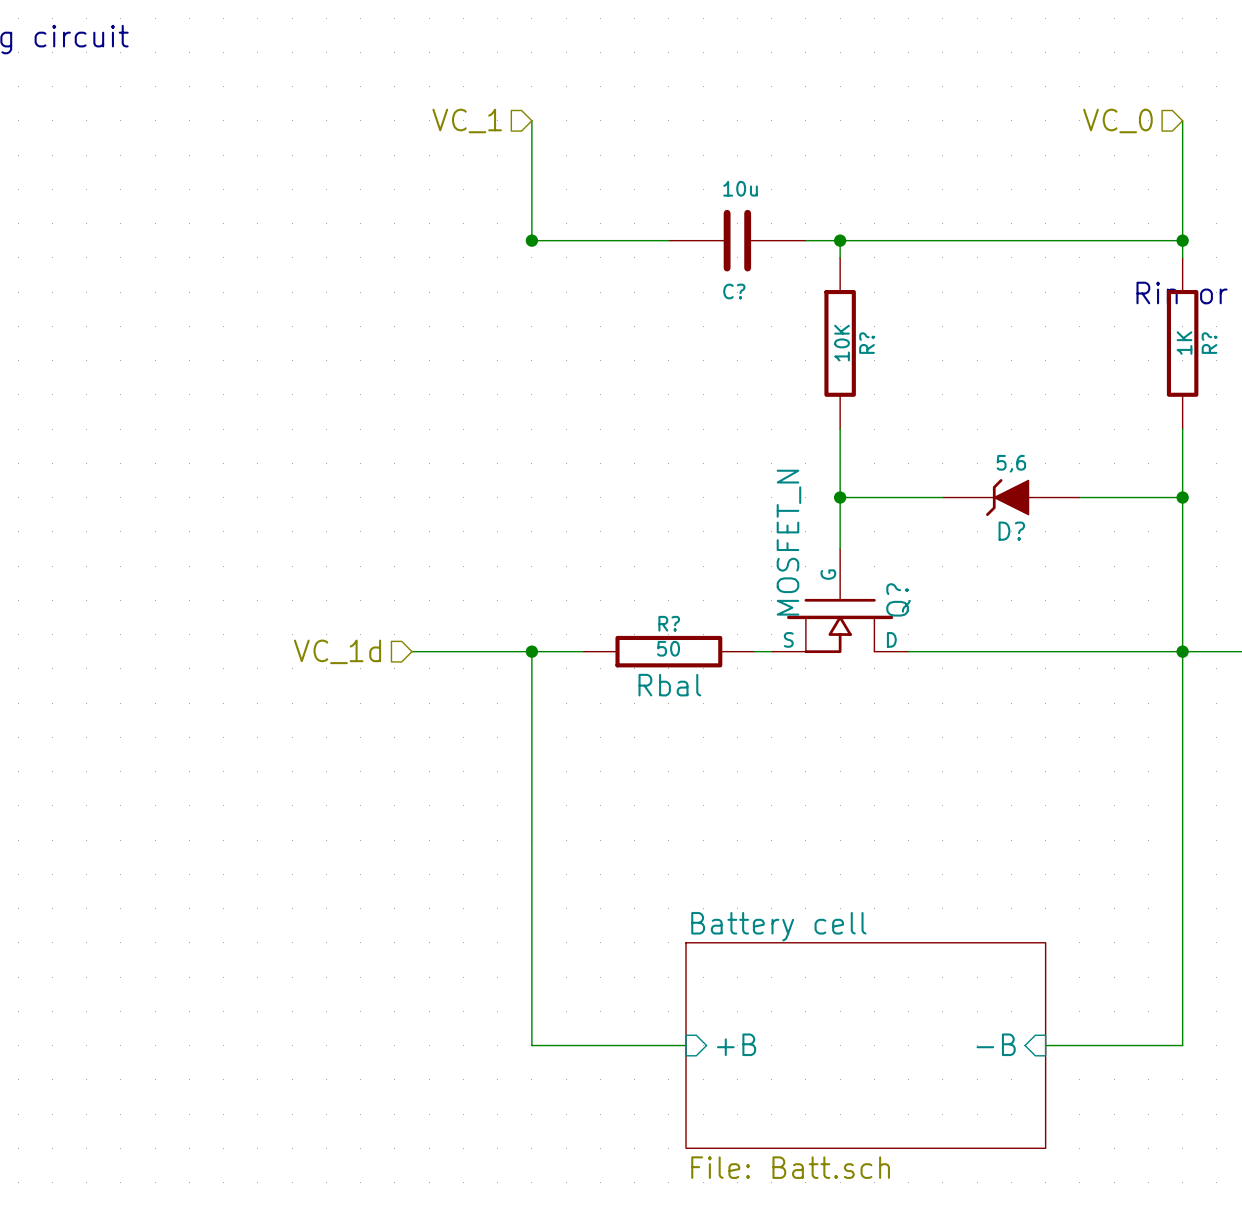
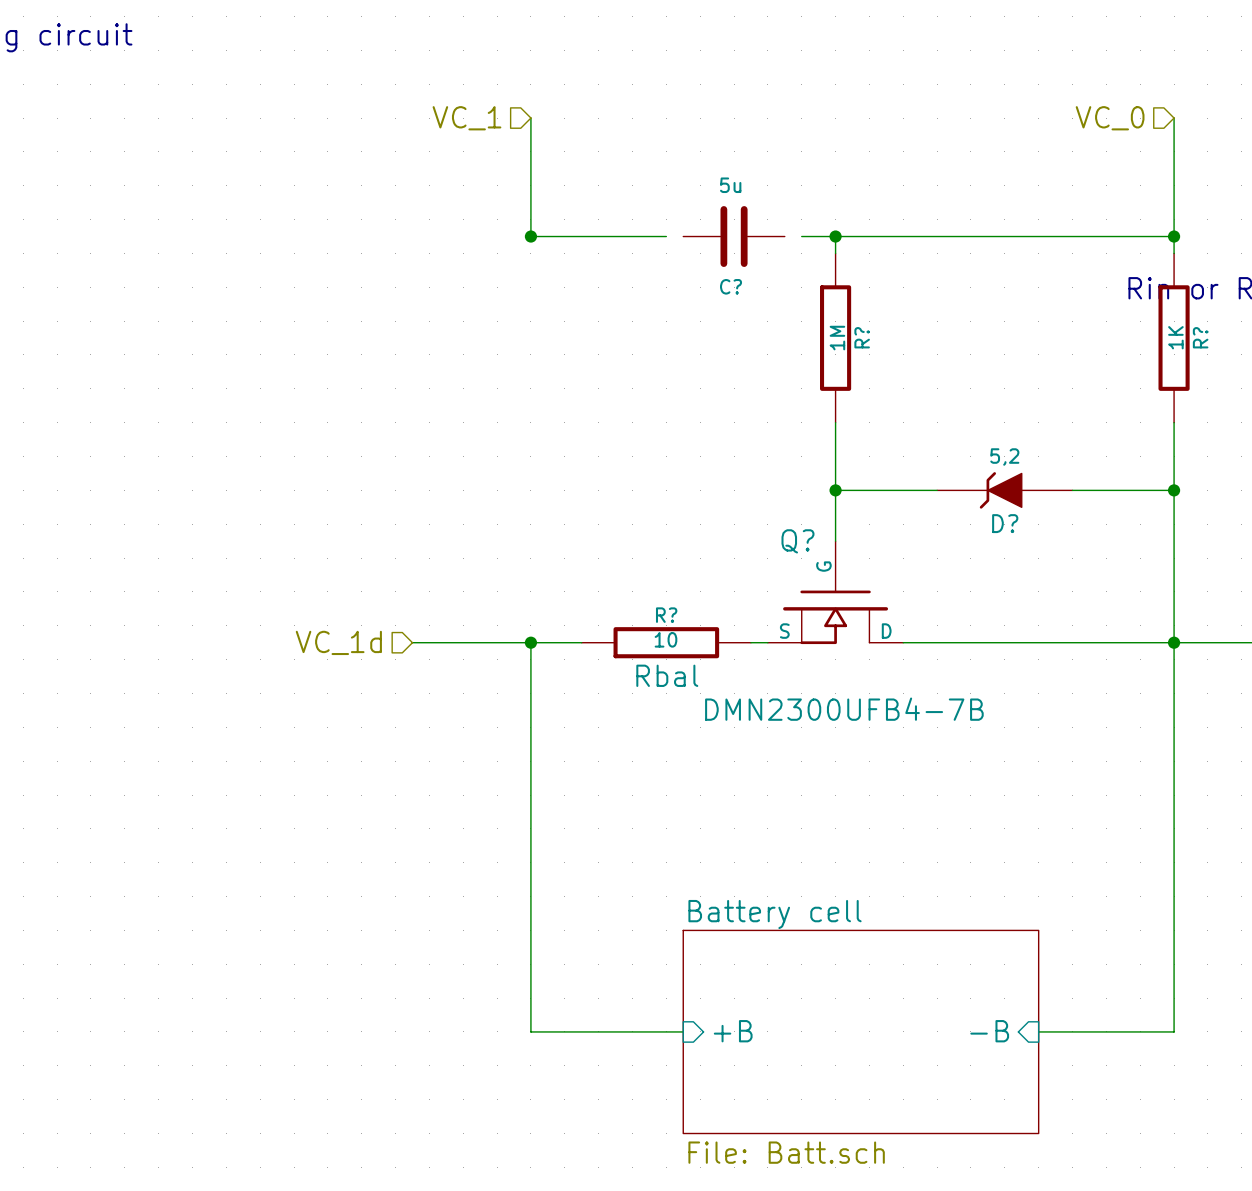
C? value: 10u (740, 188) -> 5u (730, 185)
C? symbol: [668, 209, 806, 272] -> [683, 206, 785, 267]
R? value: 10K (842, 343) -> 1M (837, 338)
D? value: 5,6 (1011, 463) -> 5,2 (1004, 457)
Q? value: MOSFET_N (788, 542) -> DMN2300UFB4-7B (844, 709)
Q? name rotation: 0° (898, 599) -> 90° clockwise (797, 541)
Q? name position: Q? (898, 599) -> Q? (797, 541)
R? value: 50 (668, 648) -> 10 (665, 639)

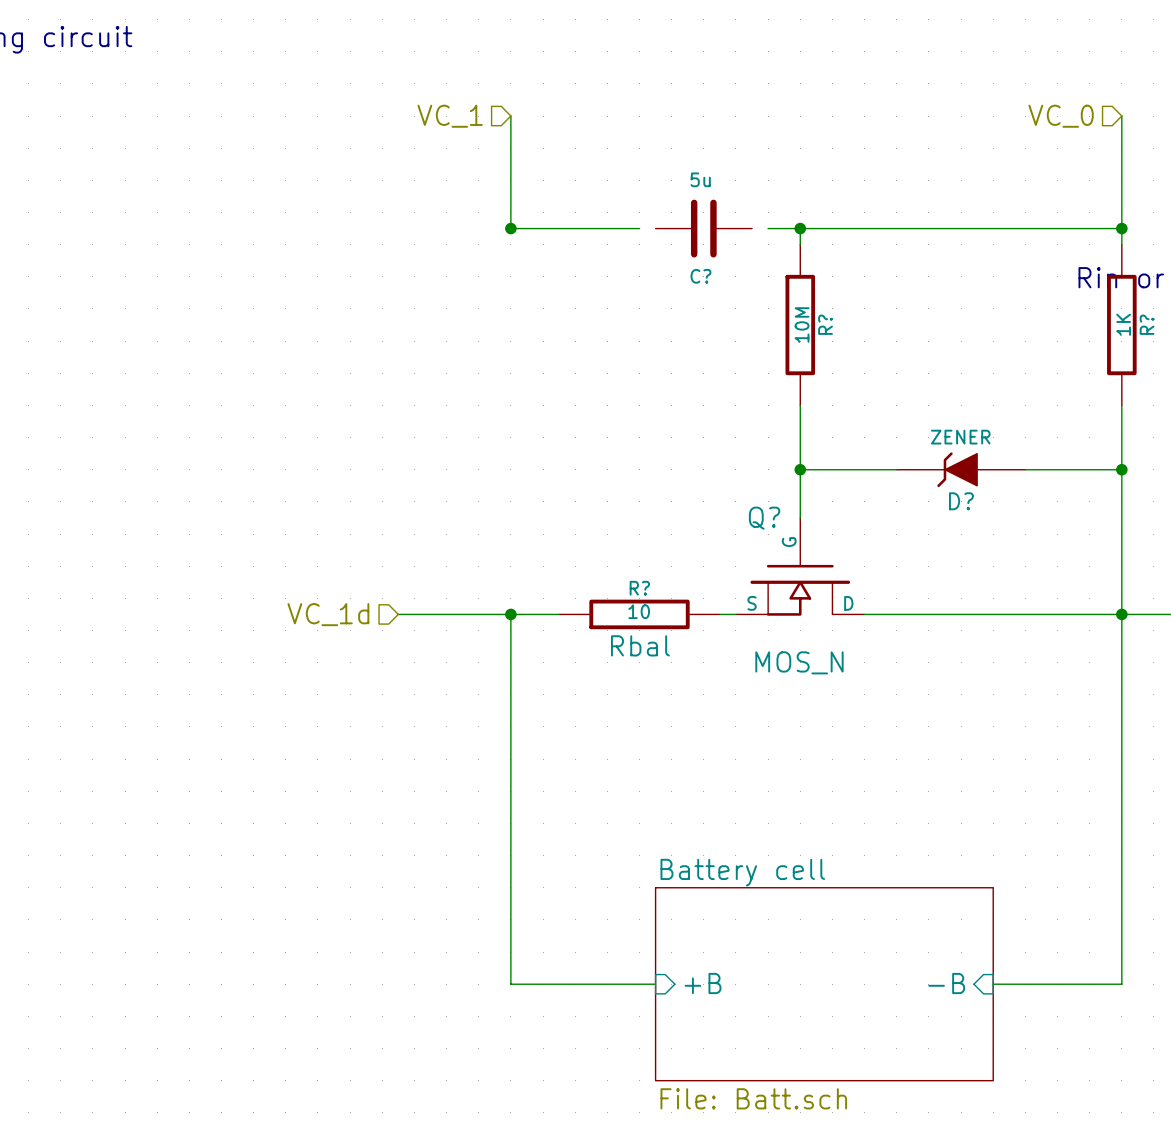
R? value: 1M (837, 338) -> 10M (802, 325)
D? value: 5,2 (1004, 457) -> ZENER (960, 437)
Q? value: DMN2300UFB4-7B (844, 709) -> MOS_N (799, 662)

